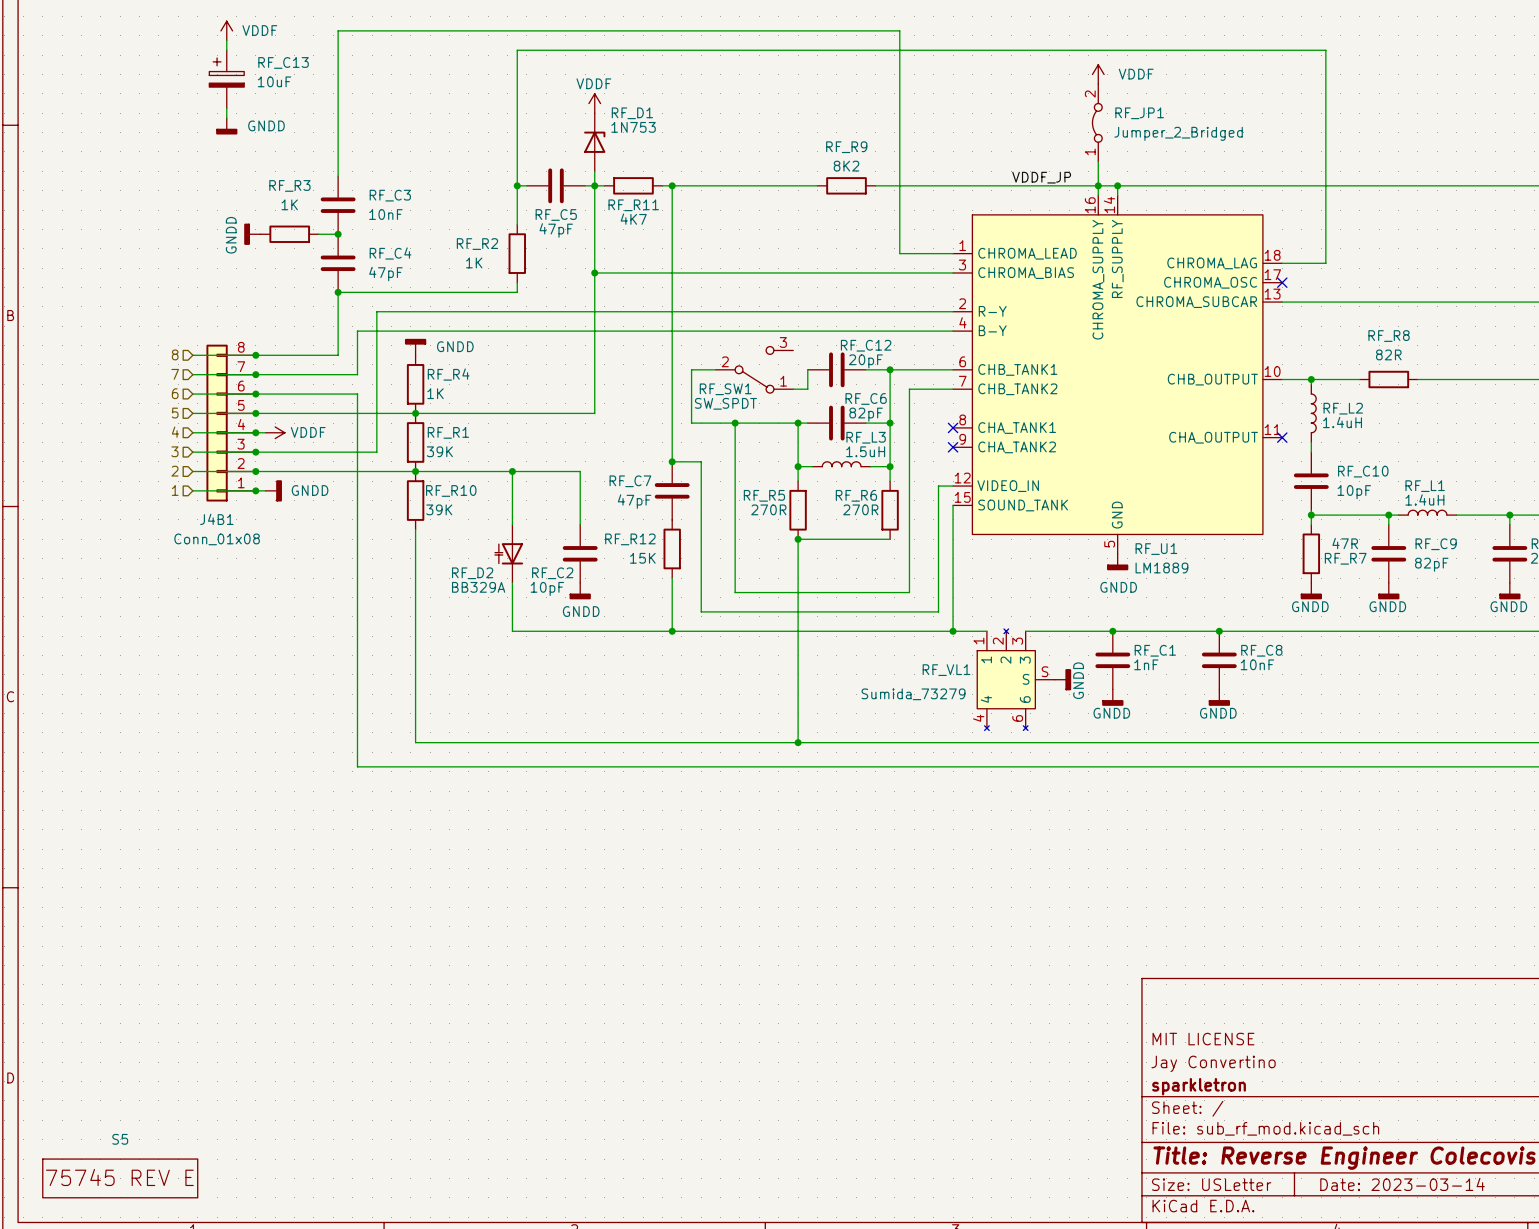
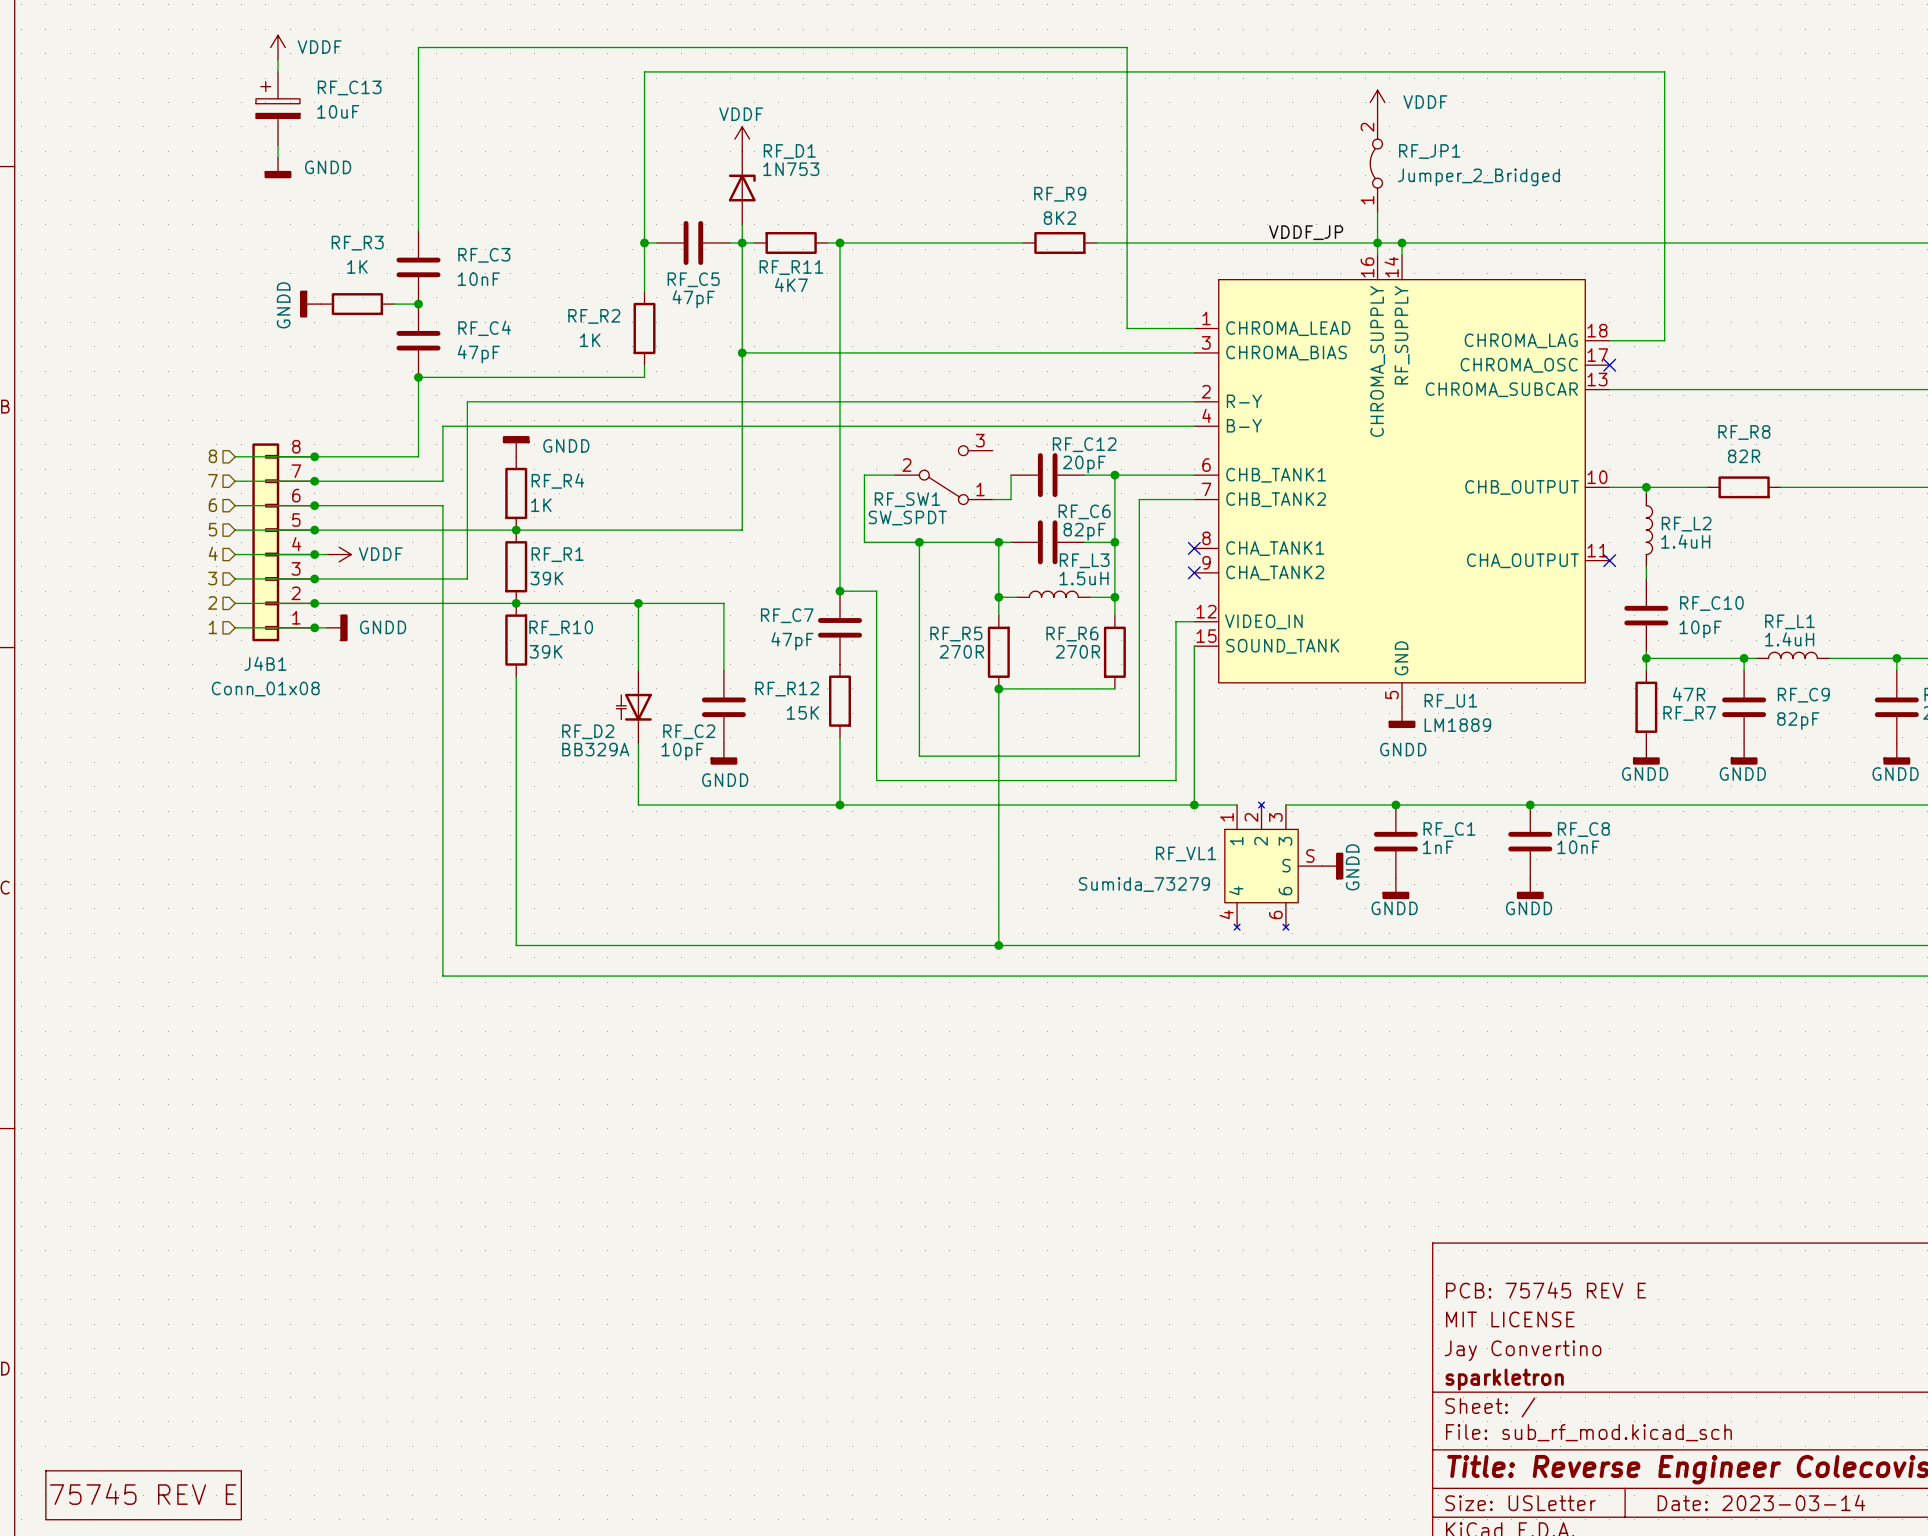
title block: none -> PCB: 75745 REV E (1546, 1290)
S5 name: S5 (120, 1139) -> none

